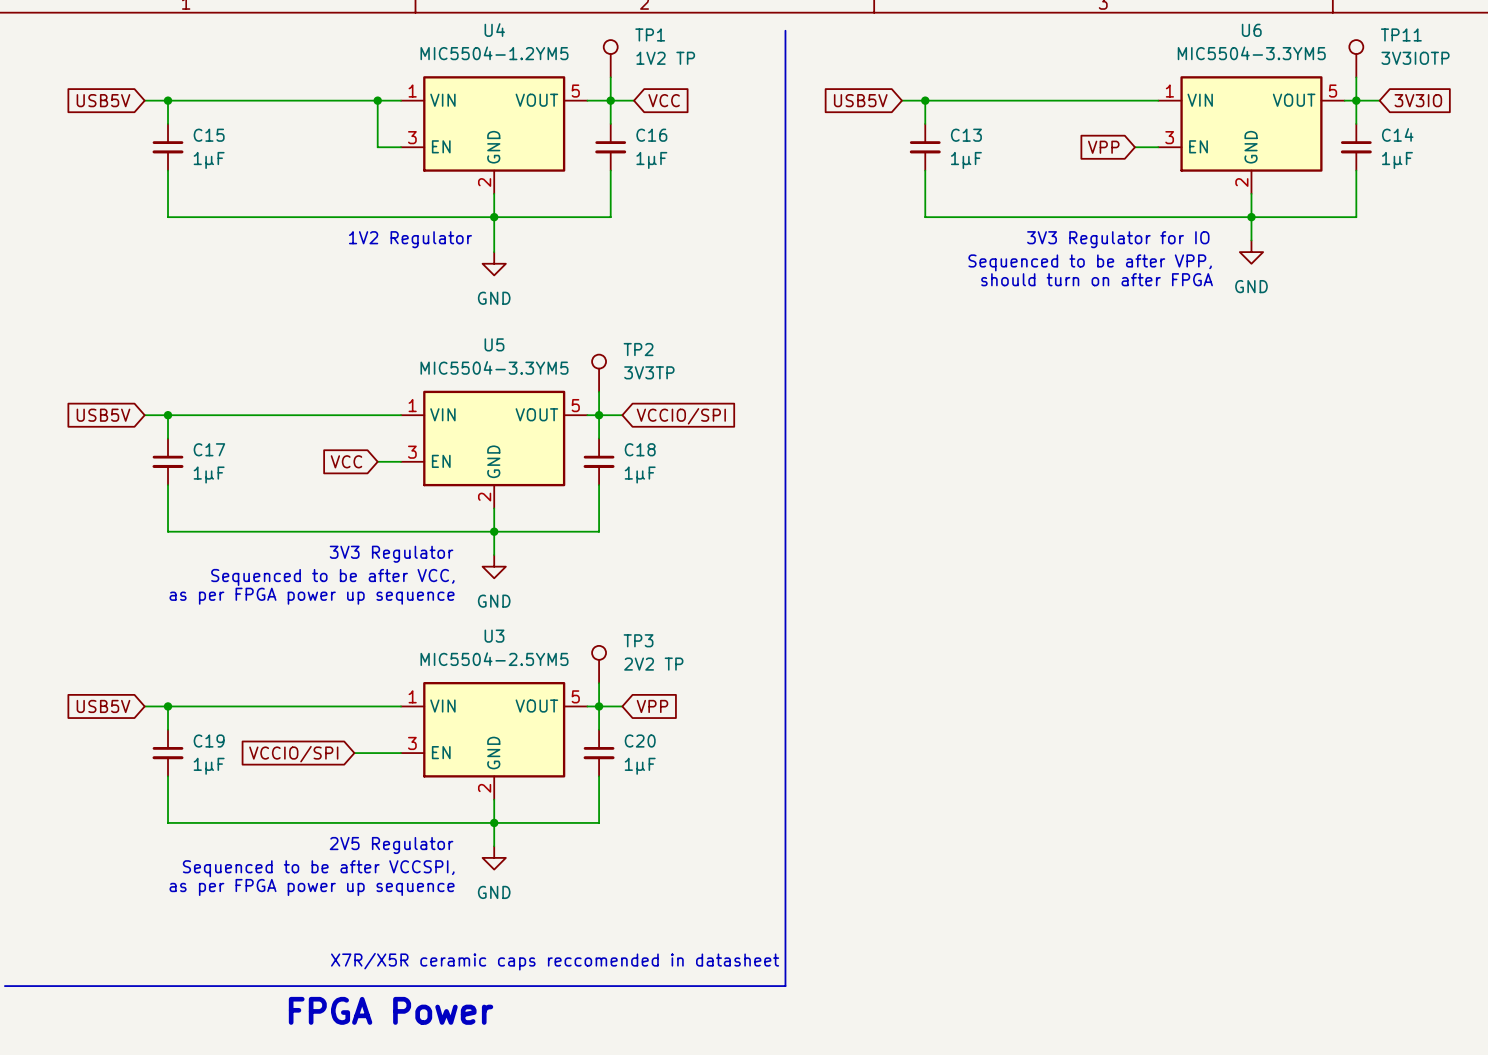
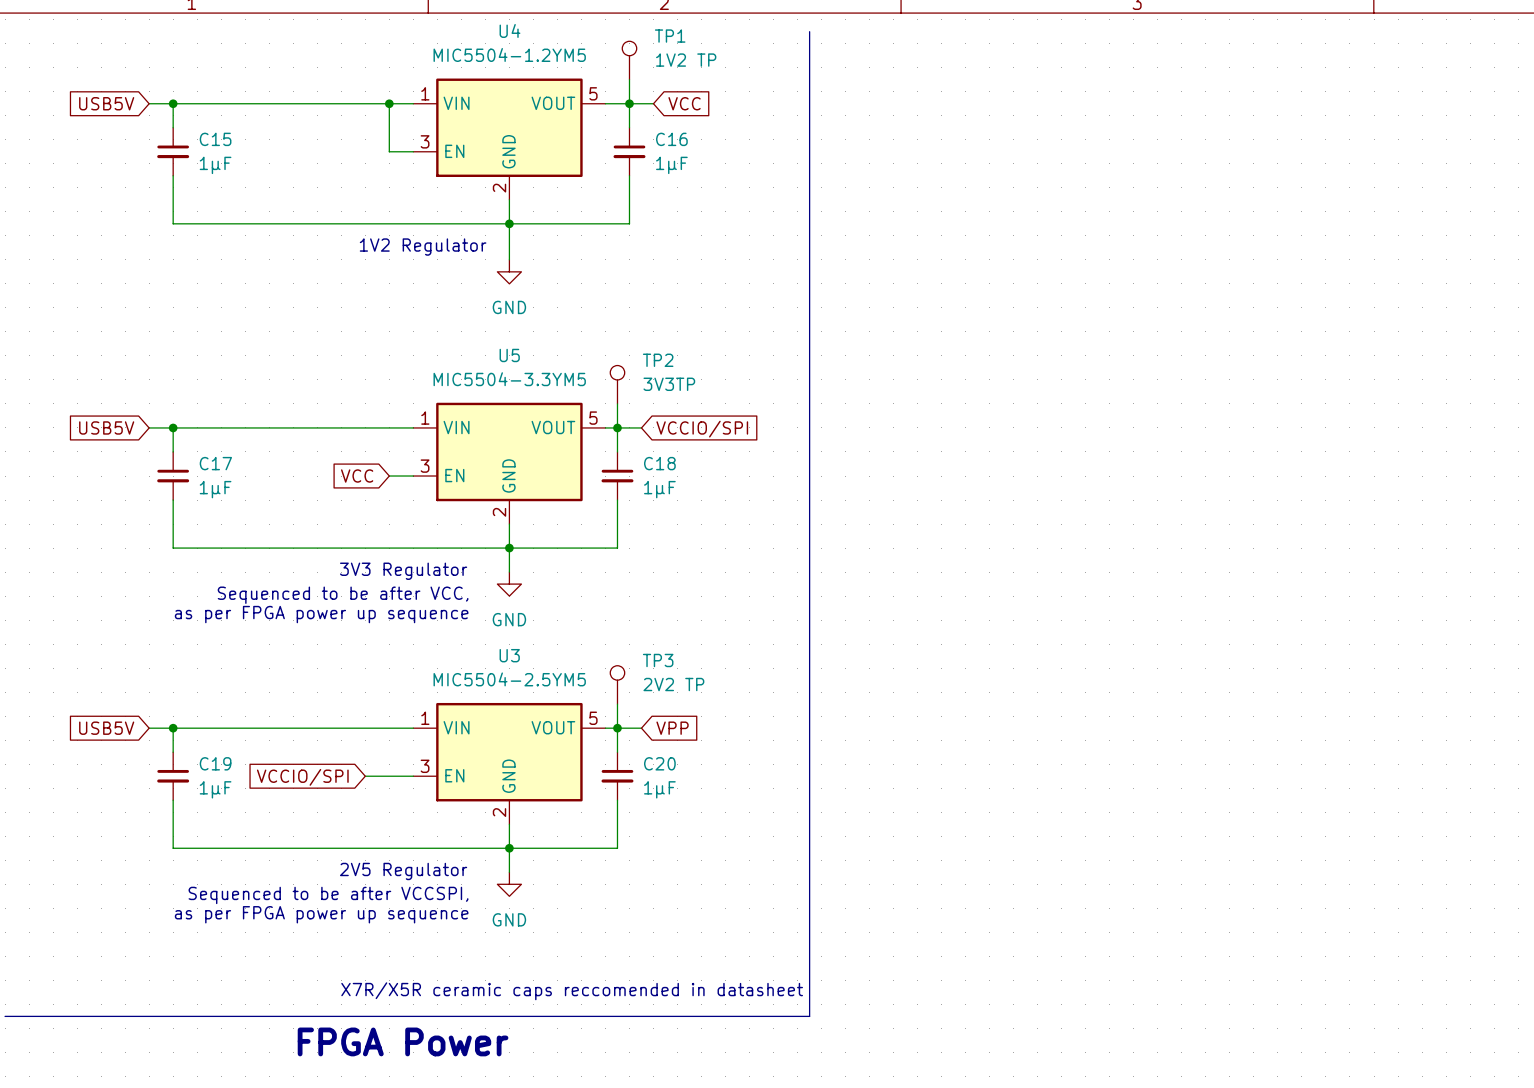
TP11: 3V3IOTP (1356, 58) -> none
wire: (1356, 77) (1356, 123) -> none
global label: USB5V (860, 100) -> none
wire: (901, 100) (1158, 100) -> none
wire: (925, 100) (925, 123) -> none
junction: (925, 100) -> none
wire: (1344, 100) (1379, 100) -> none
junction: (1356, 100) -> none
global label: 3V3IO (1418, 100) -> none
U6: MIC5504-3.3YM5 (1251, 135) -> none
C13: 1μF (925, 147) -> none
global label: VPP (1103, 147) -> none
wire: (1134, 147) (1158, 147) -> none
C14: 1μF (1356, 147) -> none
wire: (925, 170) (925, 217) (1356, 217) (1356, 170) -> none
wire: (1251, 193) (1251, 240) -> none
junction: (1251, 217) -> none
text: 3V3 Regulator for IO (1118, 239) -> none
power symbol: GND (1251, 252) -> none
text: Sequenced to be after VPP, (1090, 262) -> none
text: should turn on after FPGA (1097, 279) -> none

